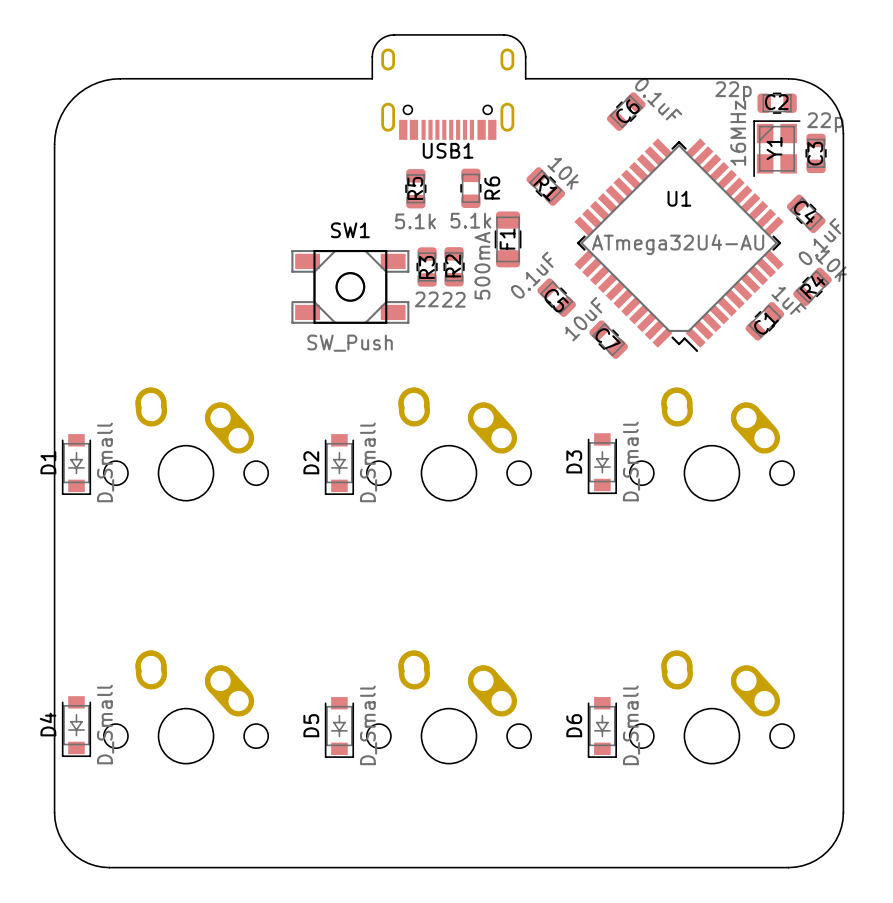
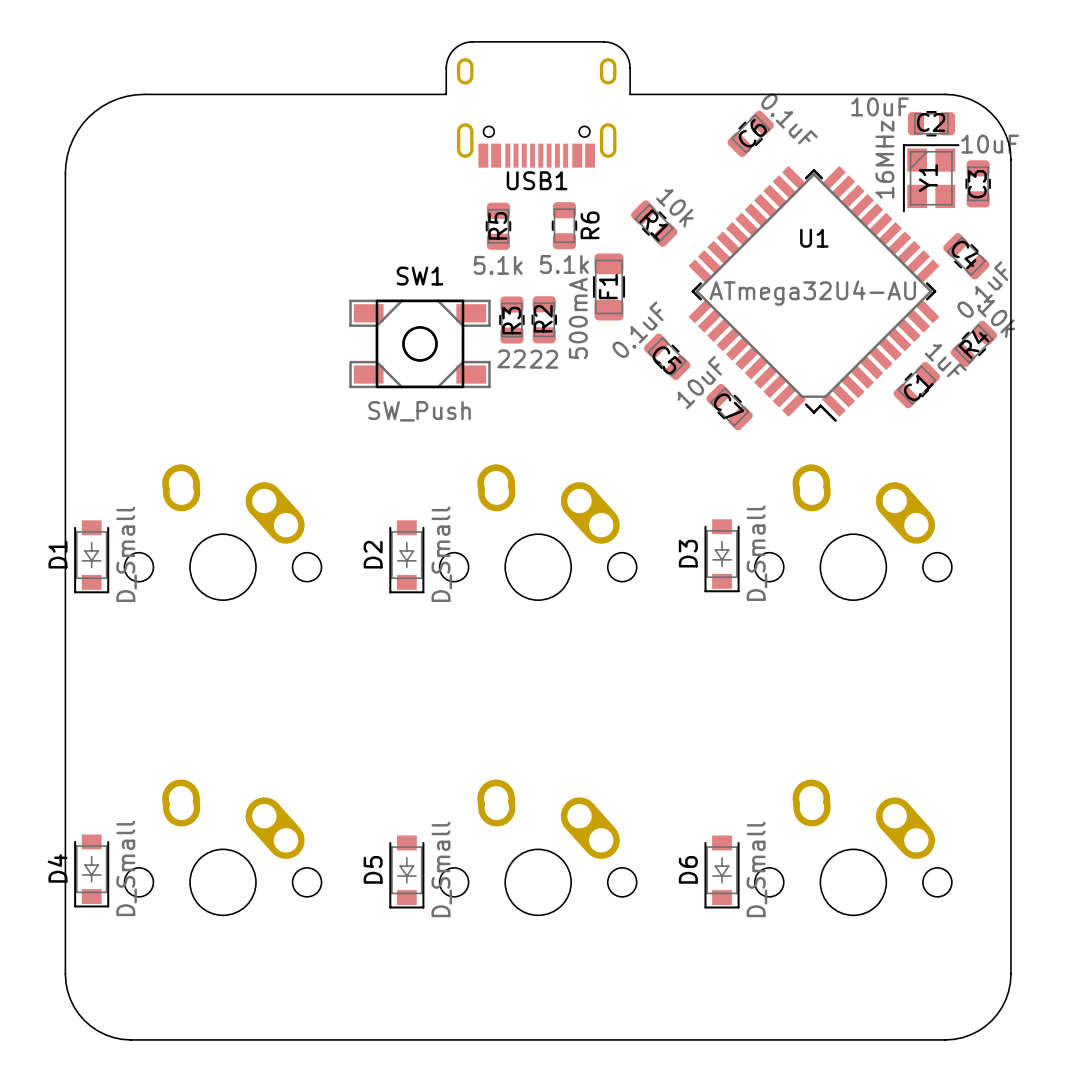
C2 value: 22p (733, 91) -> 10uF (880, 106)
C3 value: 22p (825, 122) -> 10uF (990, 144)

